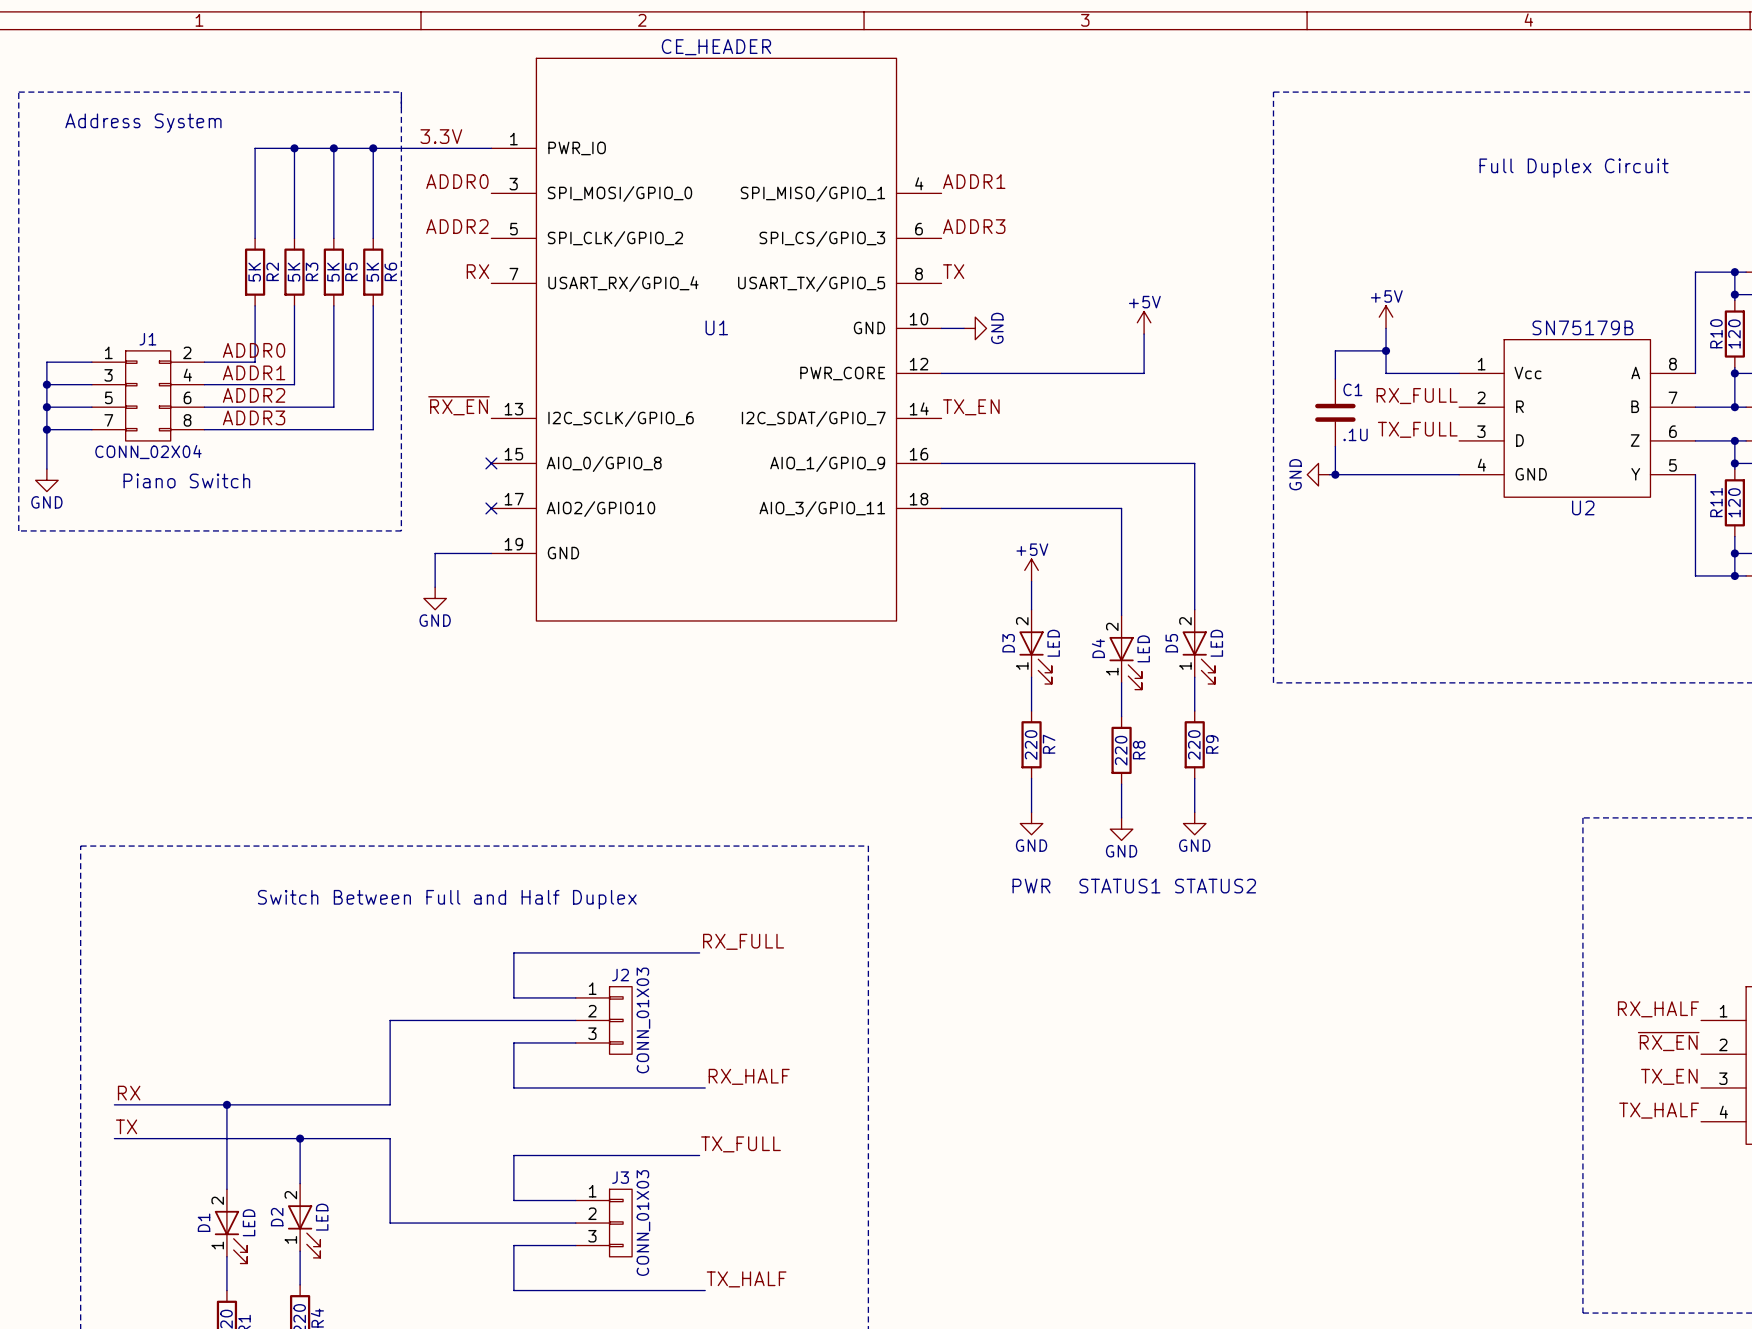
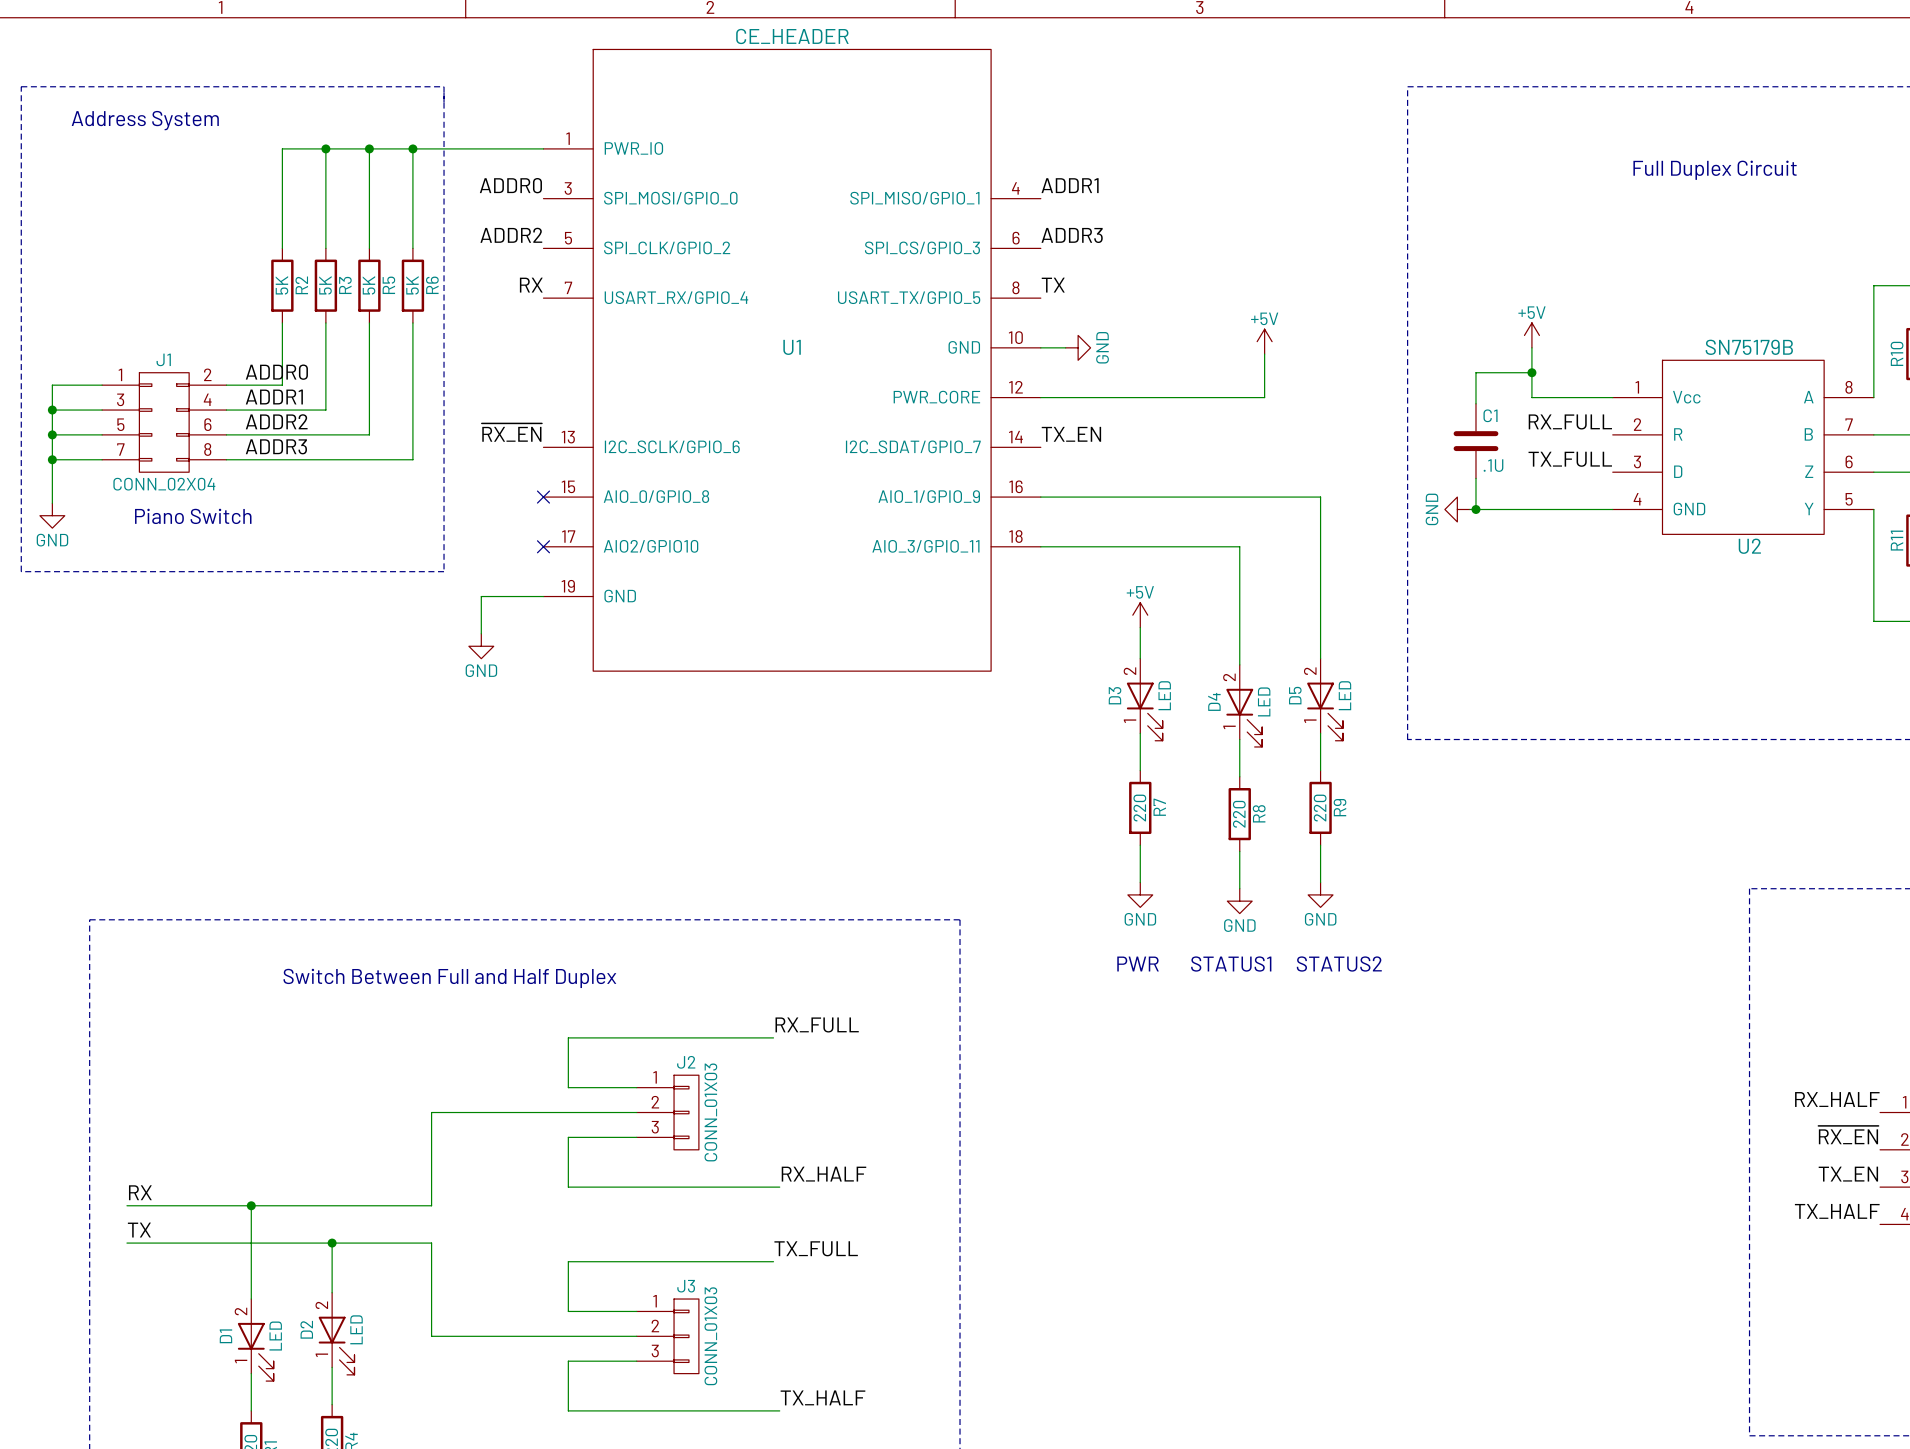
label: 3.3V (441, 136) -> none

